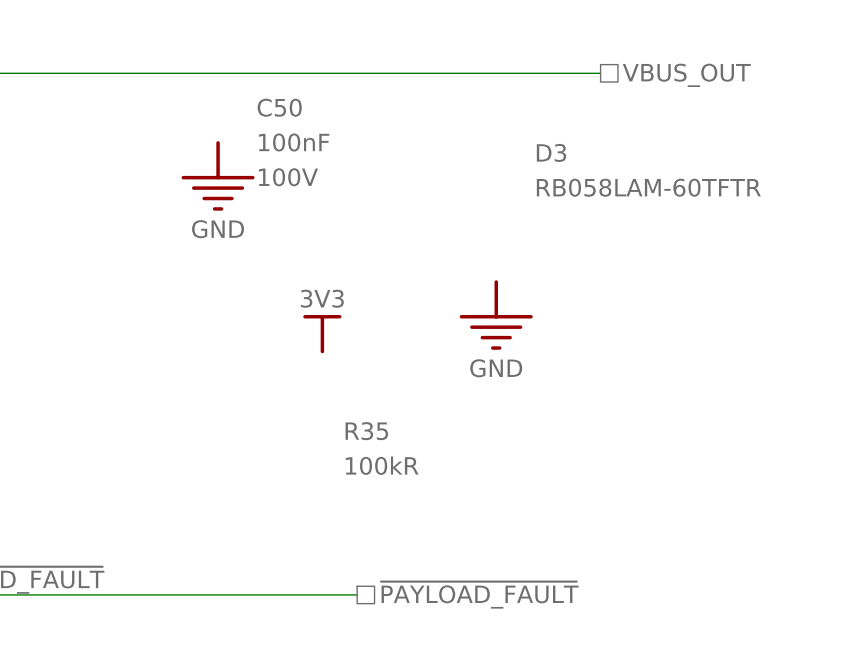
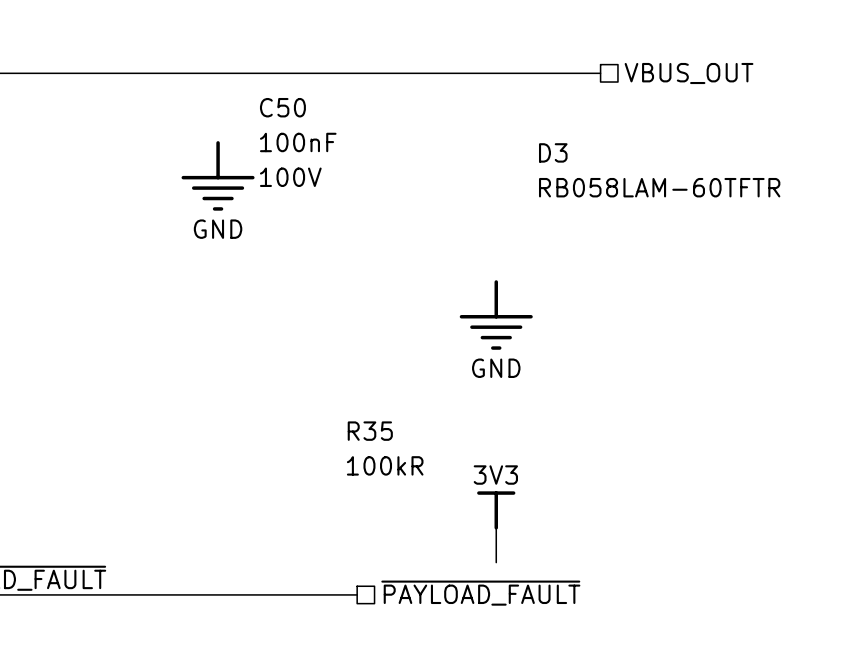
power symbol position: 3V3 (322, 334) -> 3V3 (496, 510)
wire: none -> (496, 527) (496, 562)

